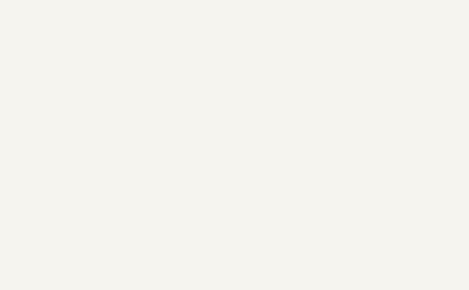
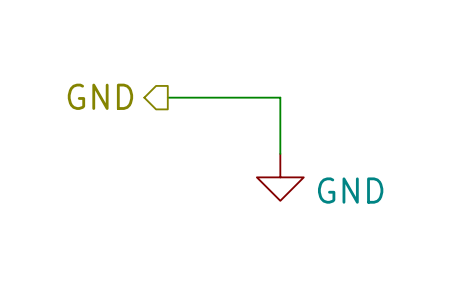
hierarchical label: none -> GND (100, 96)
wire: none -> (167, 97) (280, 97) (280, 153)
power symbol: none -> GND (280, 177)

